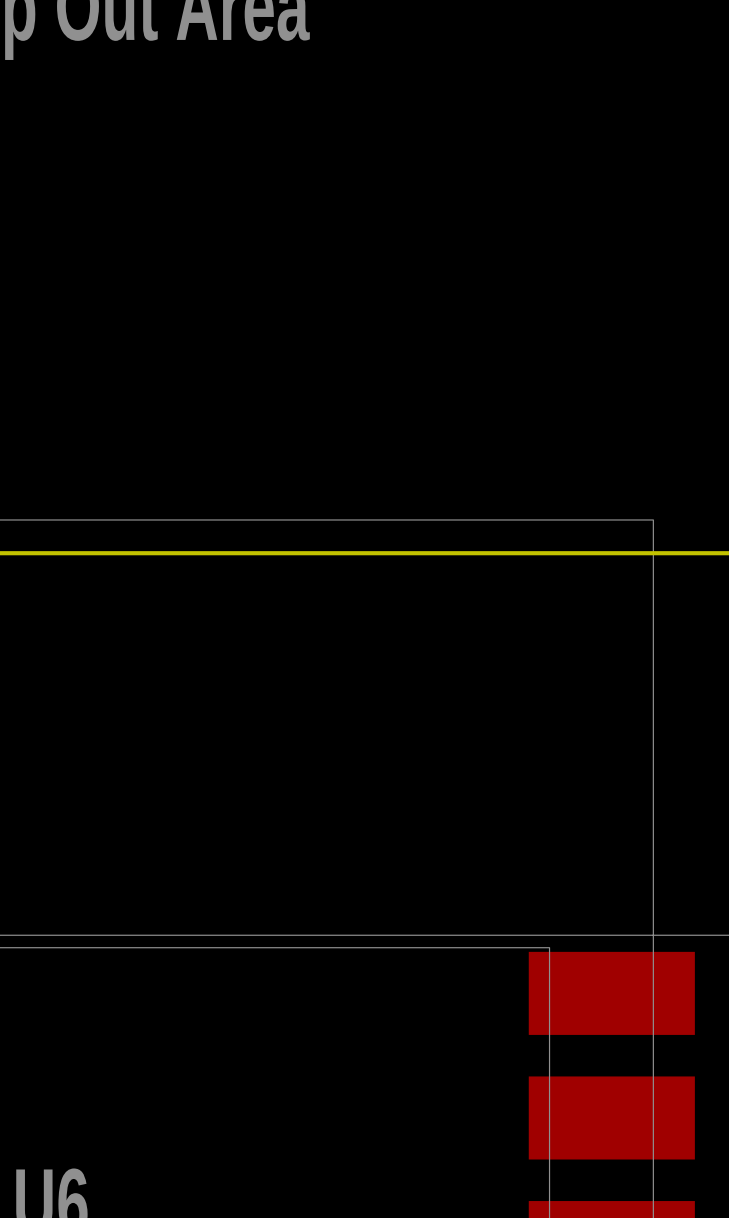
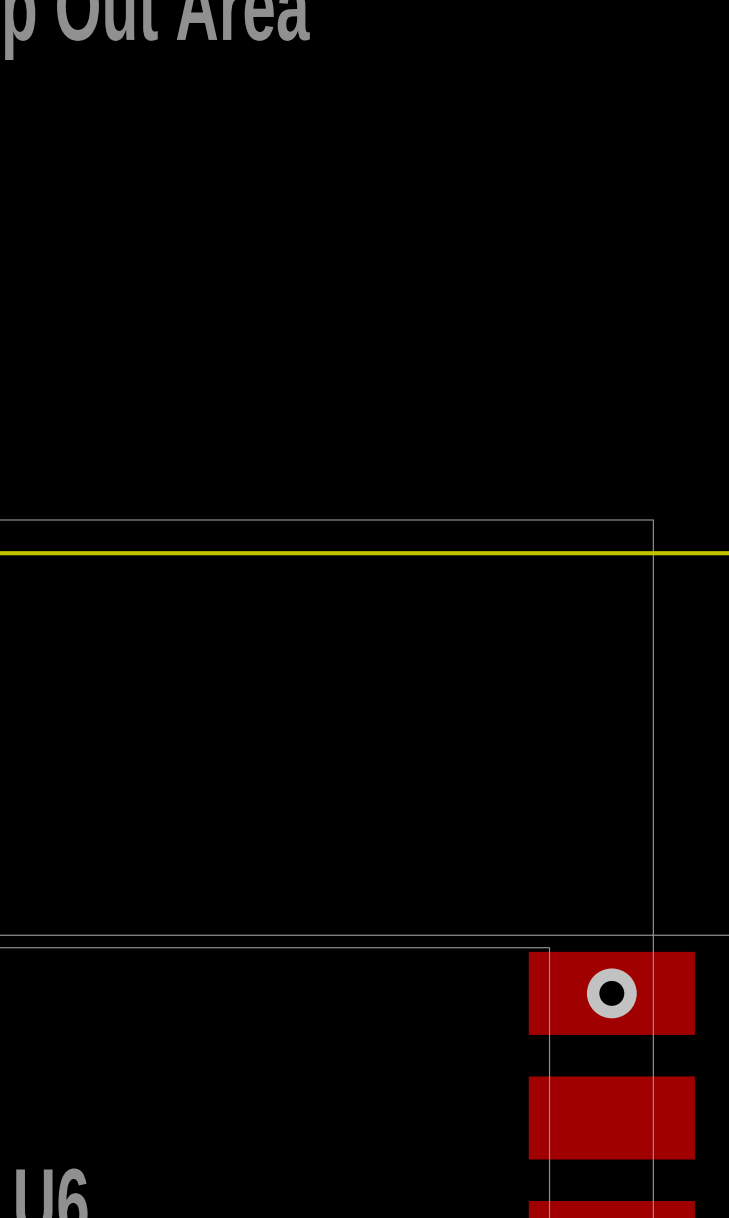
via: none -> (611, 993)

